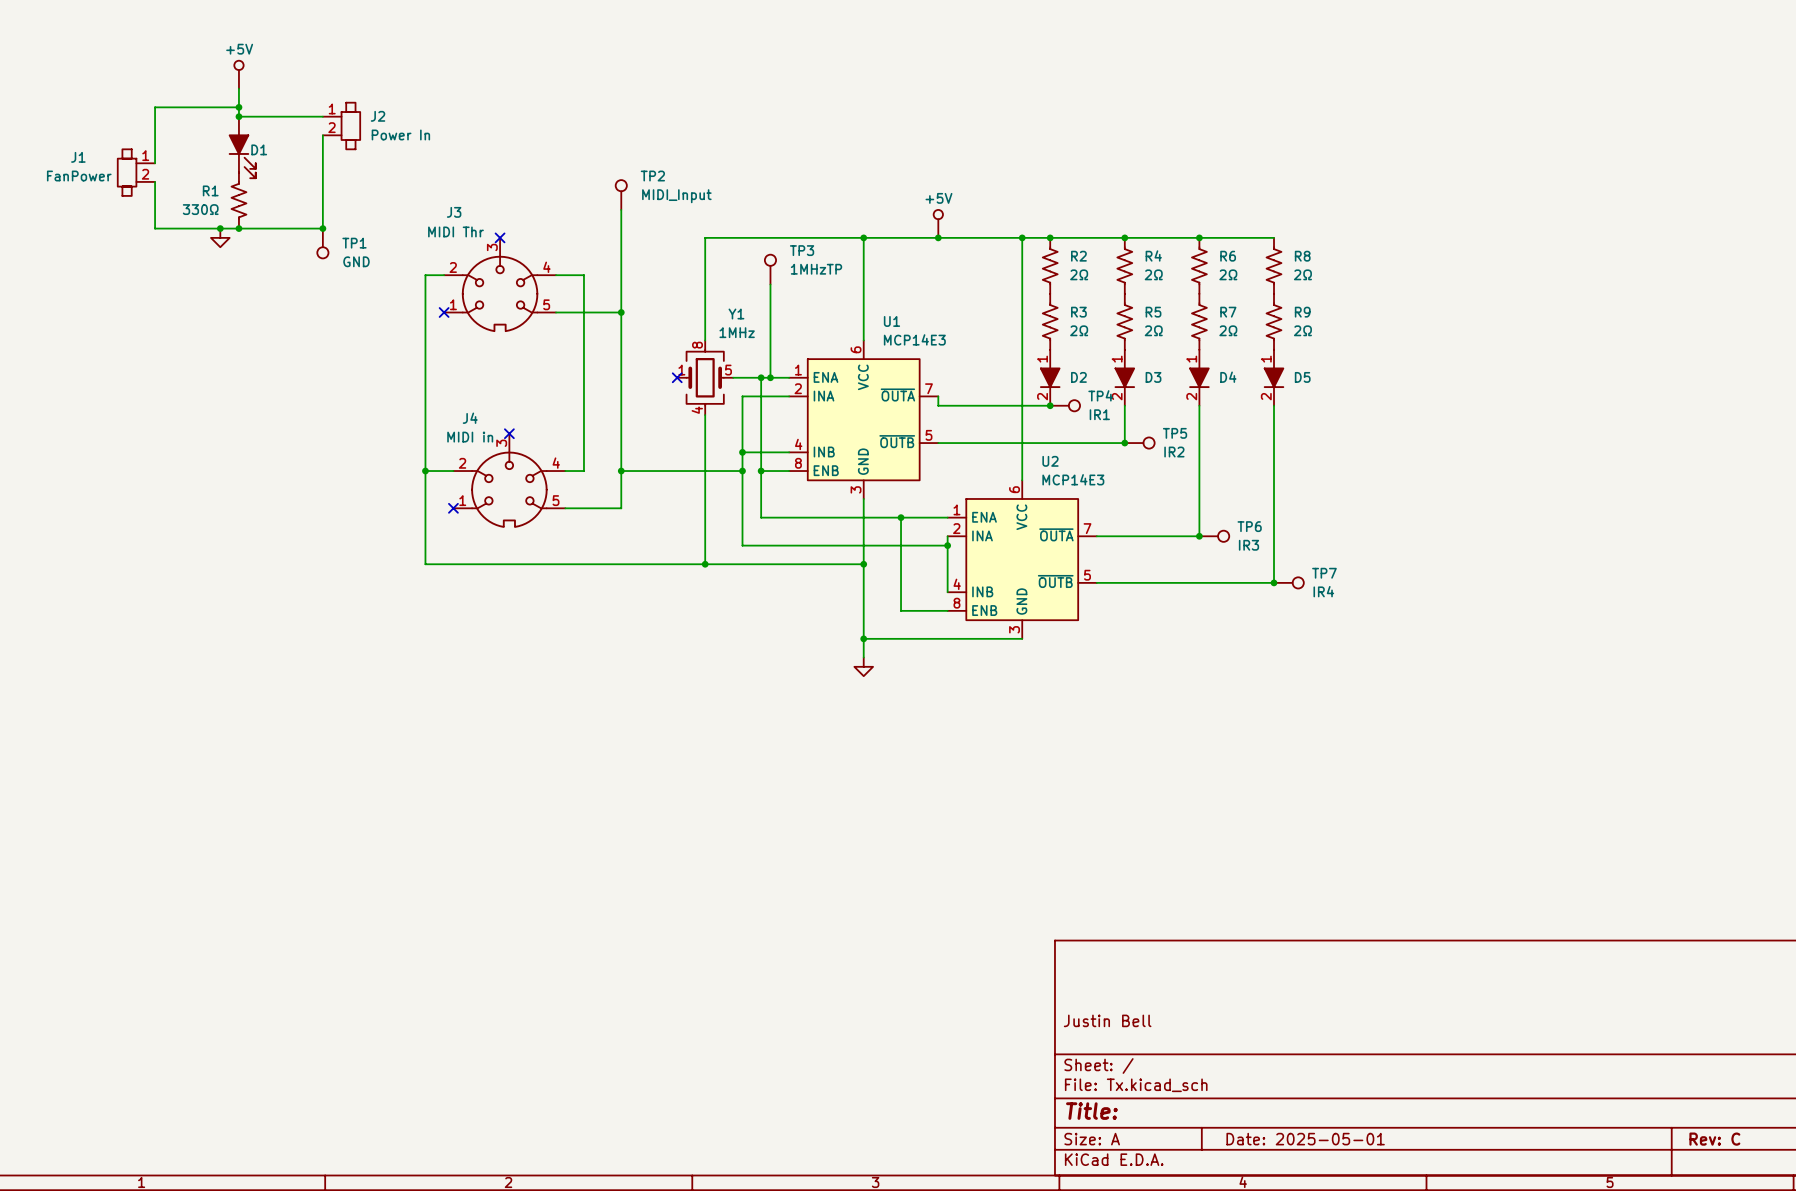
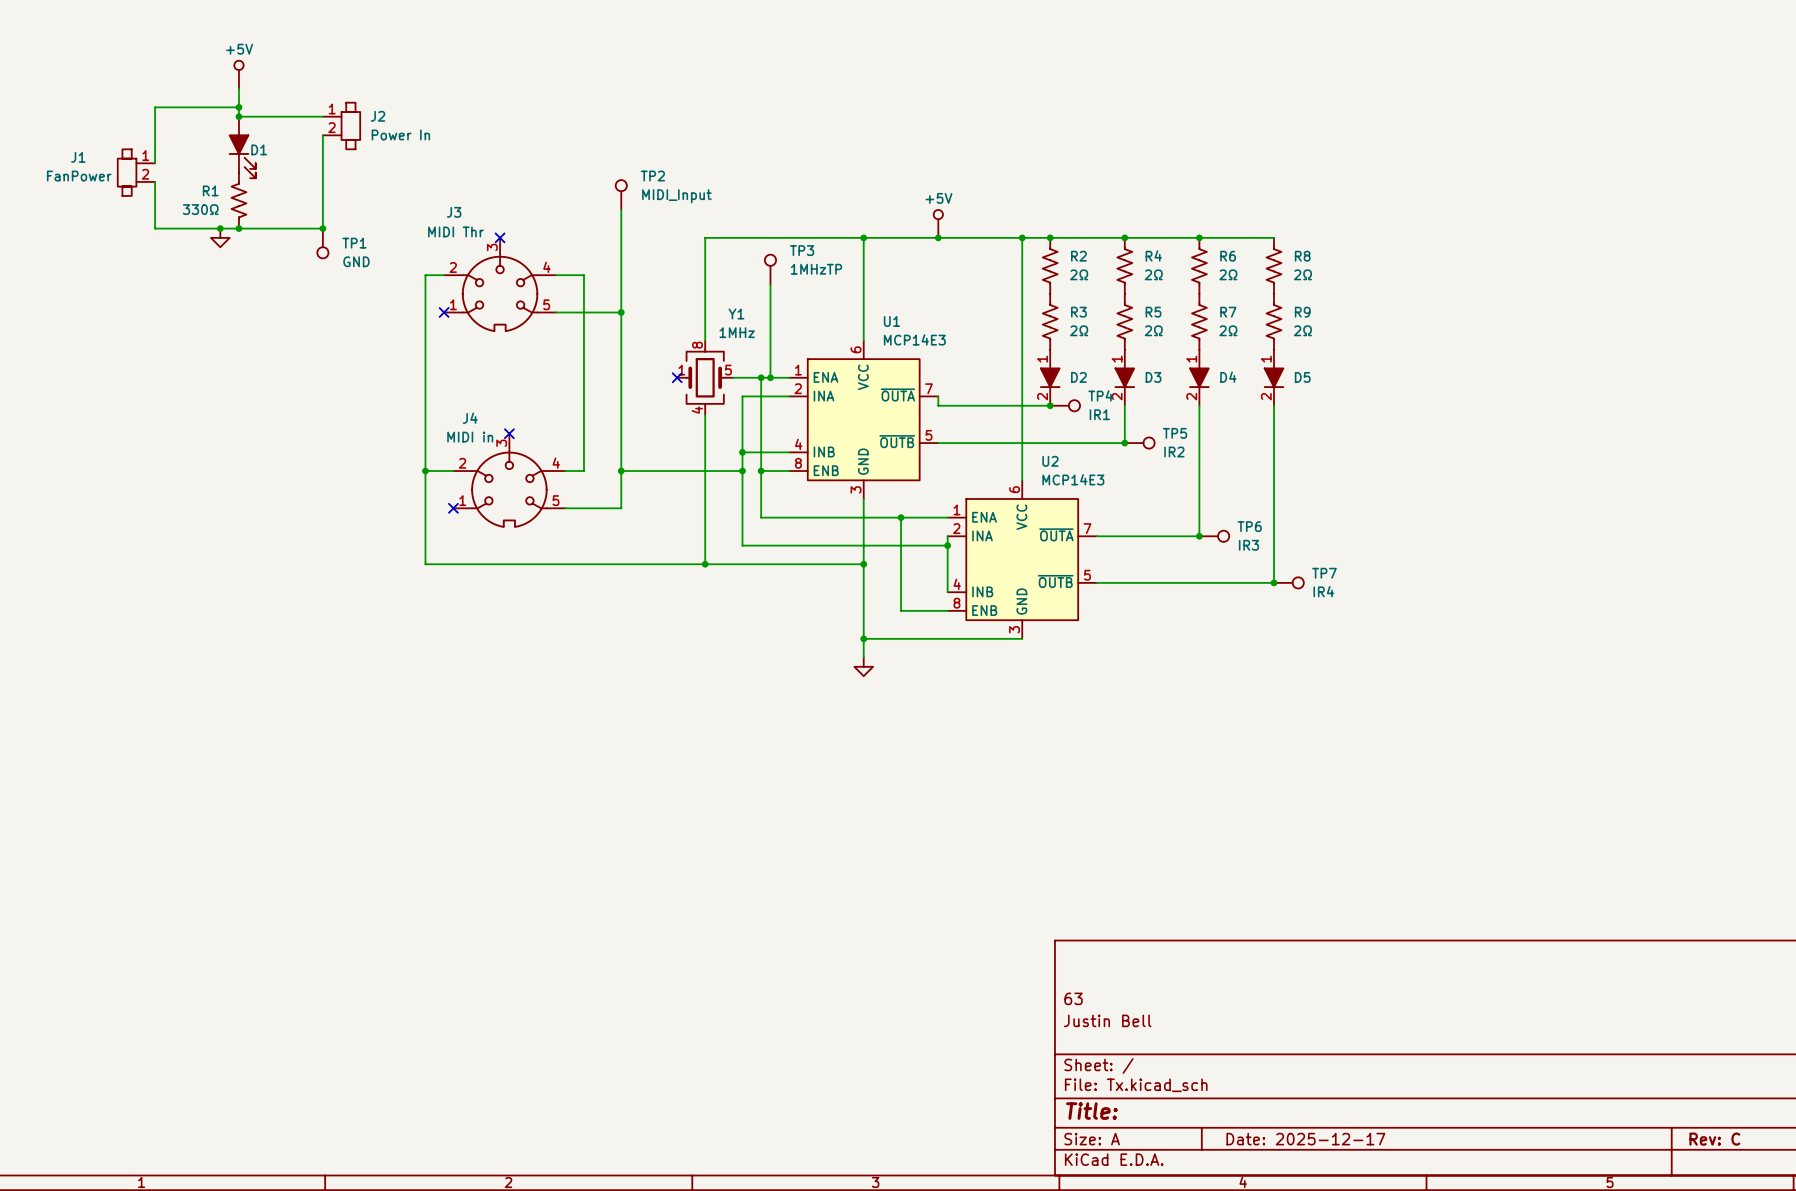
title block: none -> 63 (1073, 998)
title block: Date: 2025-05-01 (1305, 1139) -> Date: 2025-12-17 (1305, 1139)

